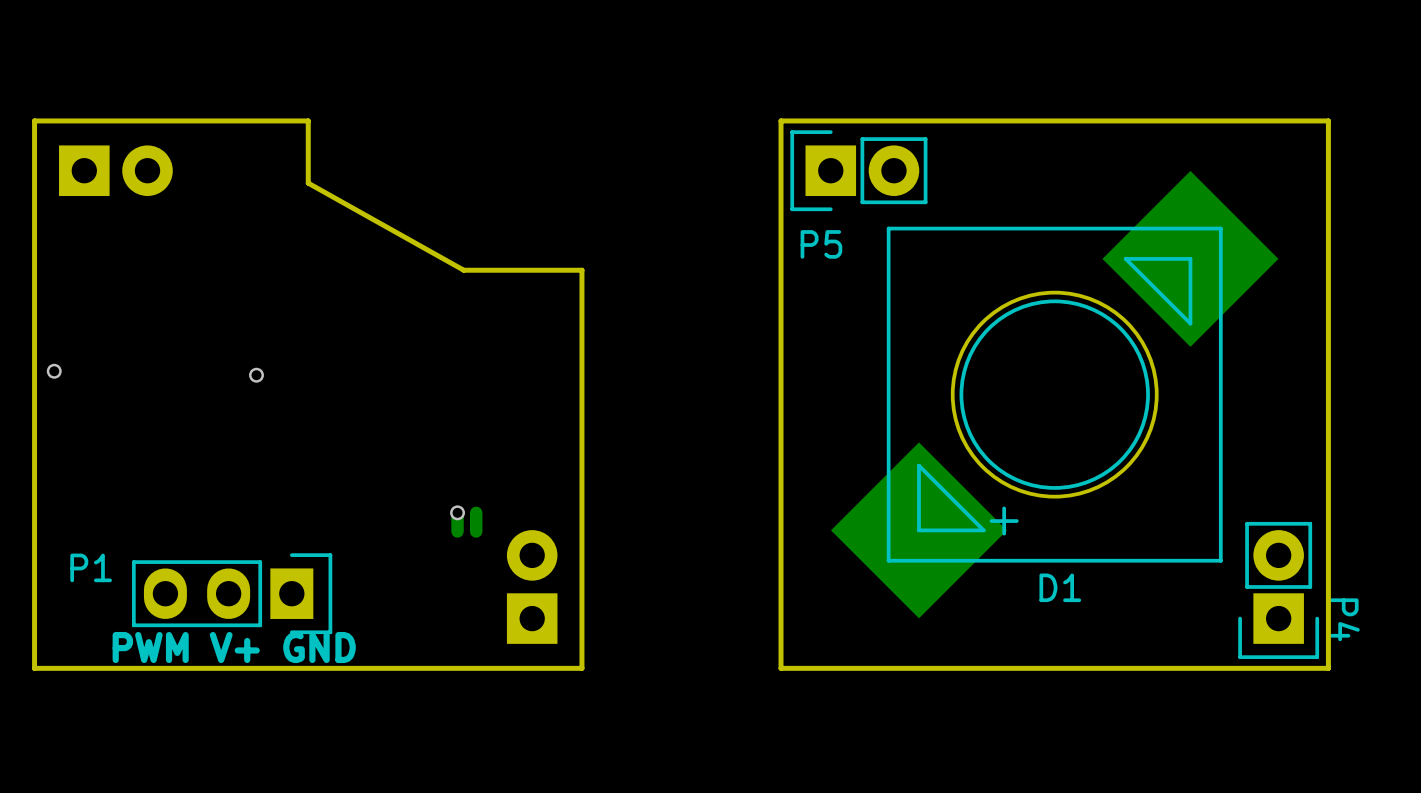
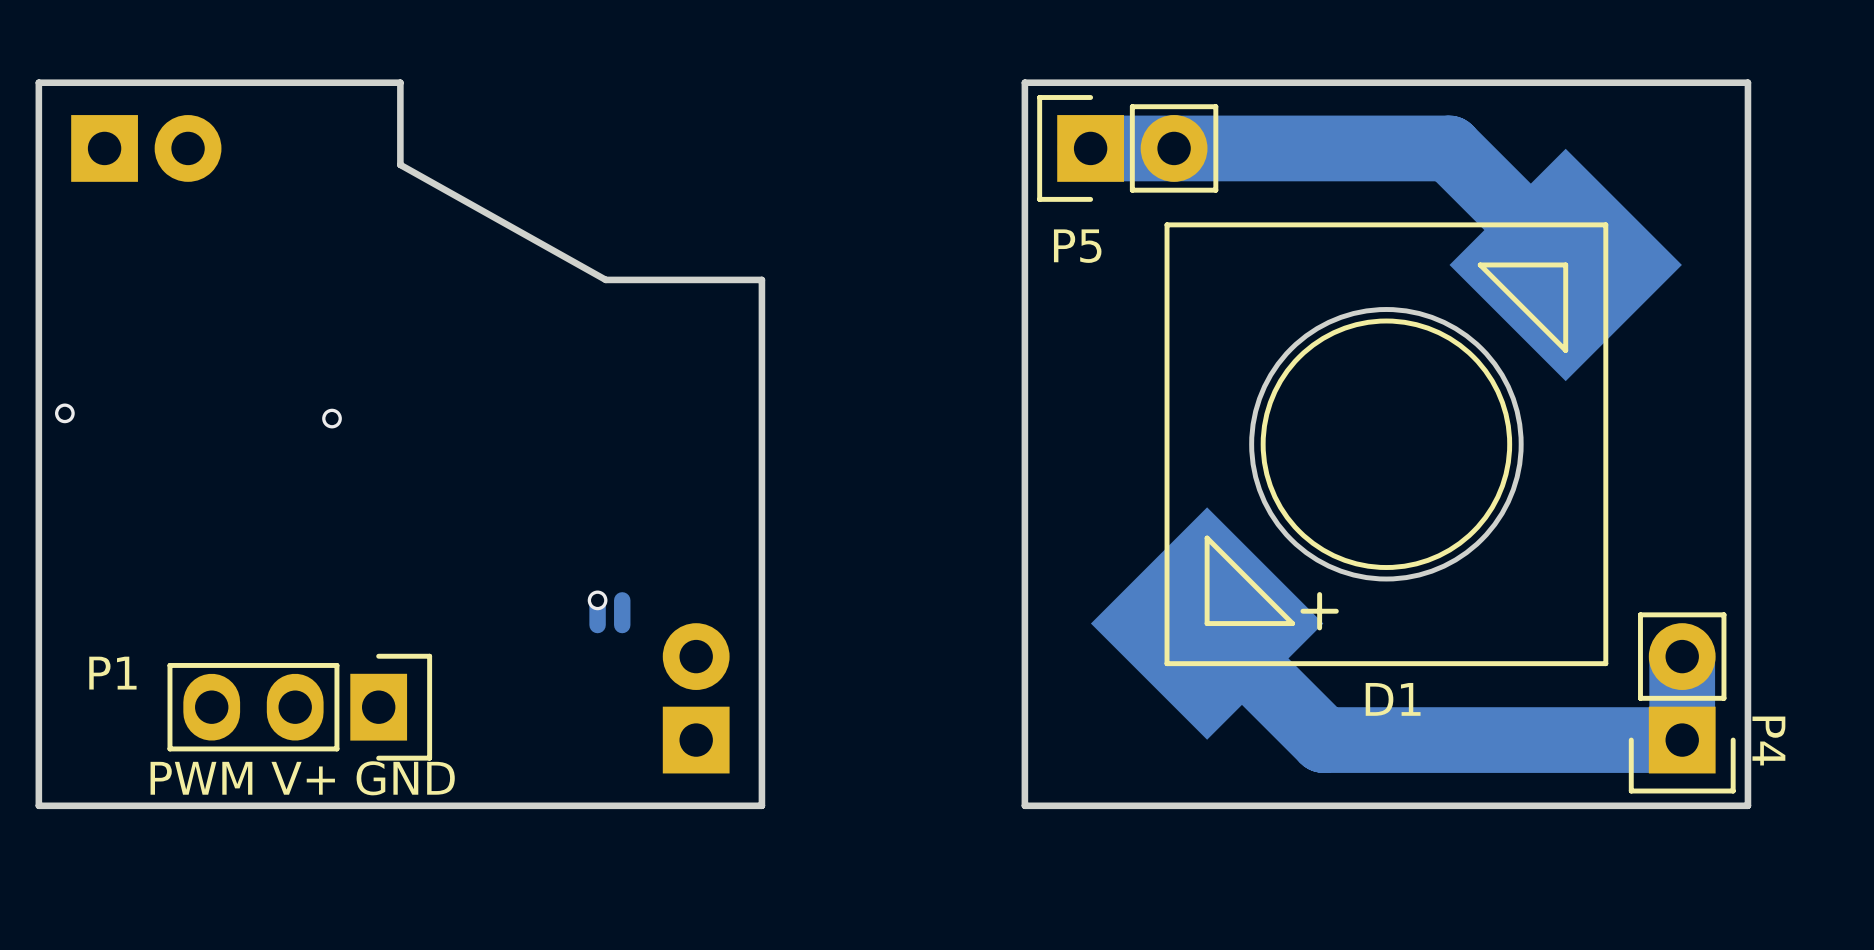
track: none -> (1090, 148) (1449, 148) (1565, 264)
track: none -> (1207, 623) (1323, 740) (1682, 740) (1682, 656)

